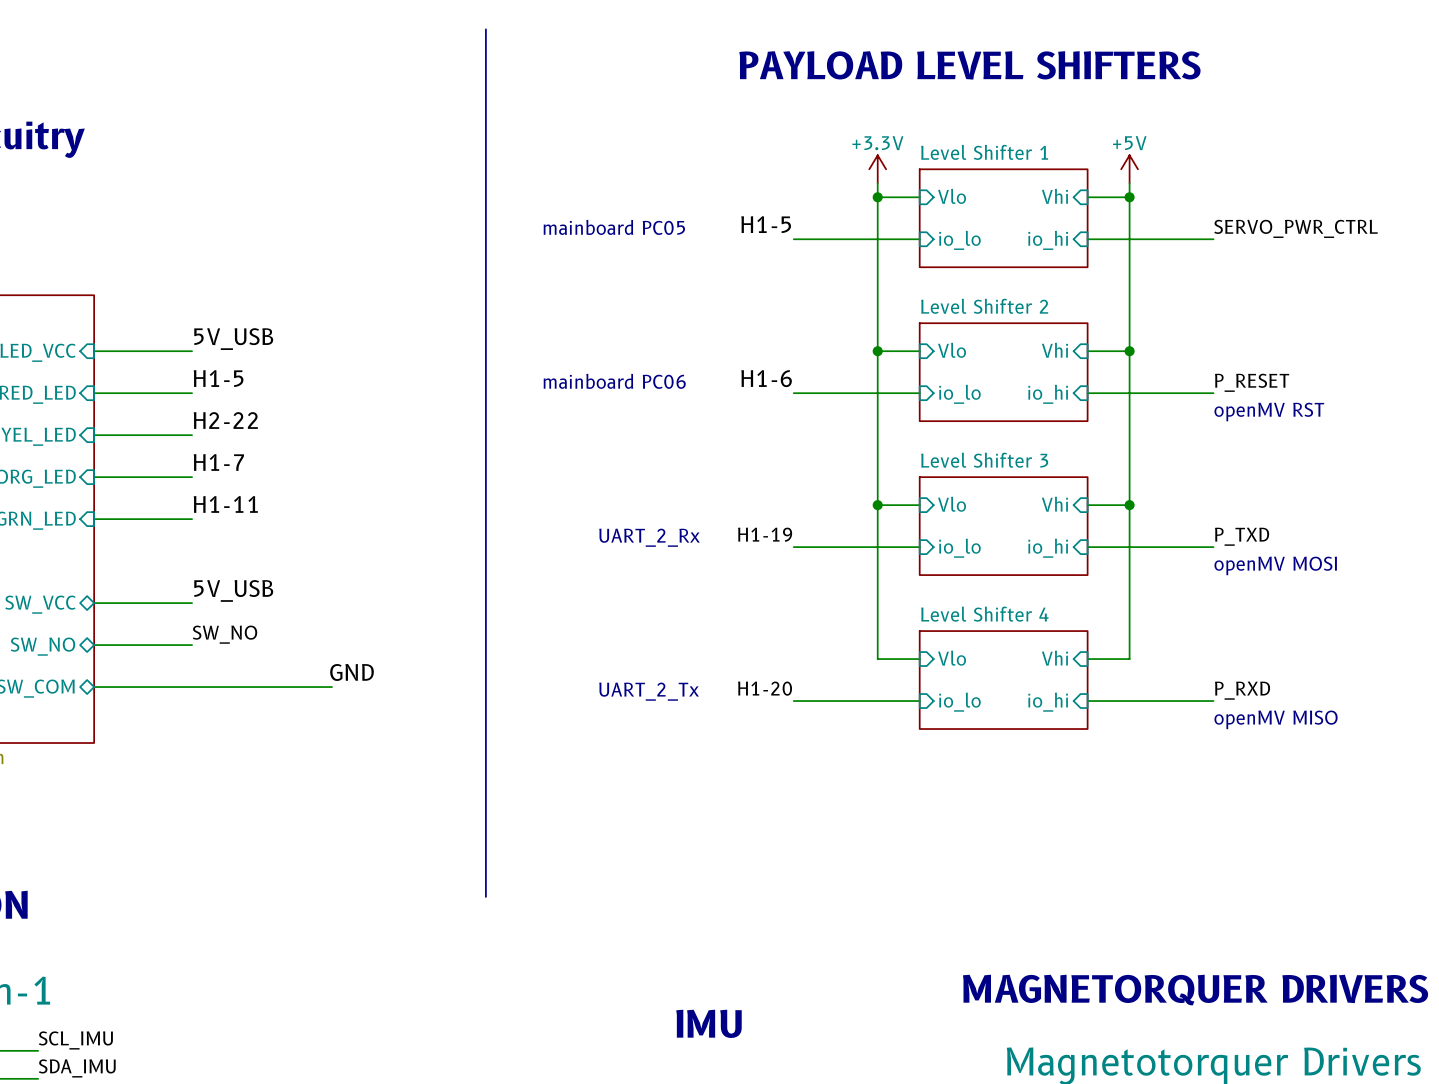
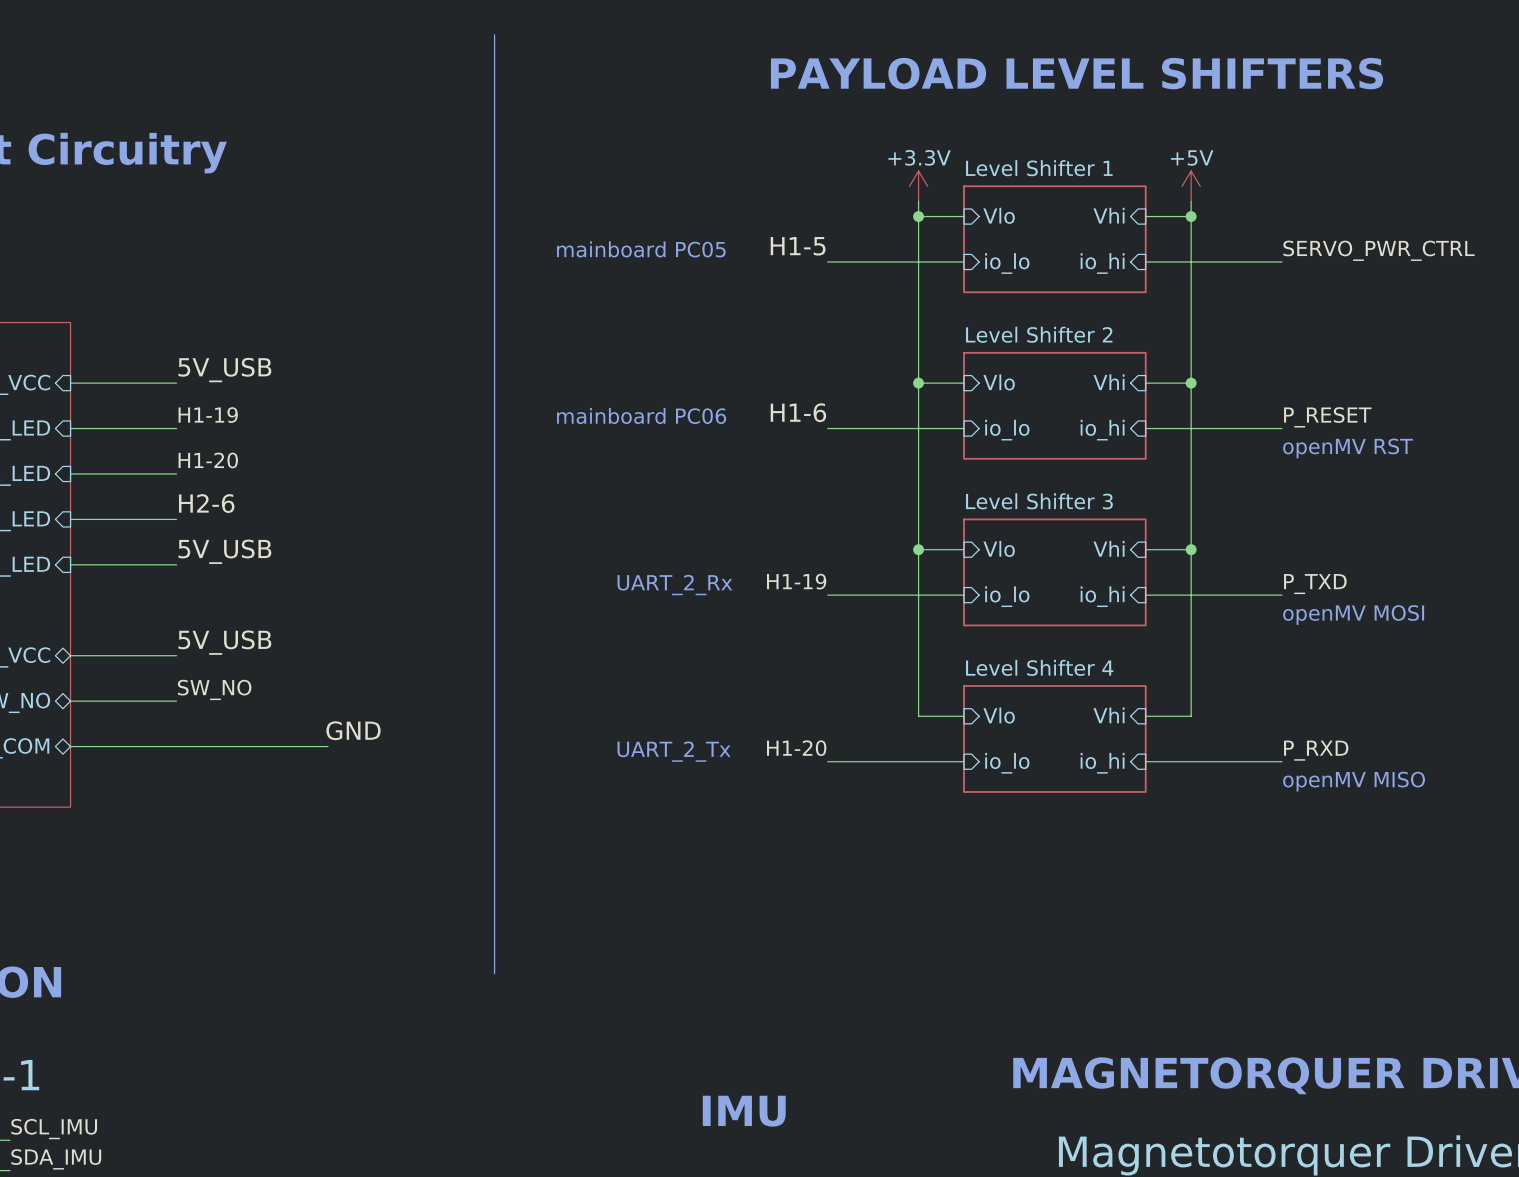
label: H1-5 (218, 378) -> H1-19 (208, 415)
label: H2-22 (225, 420) -> H1-20 (208, 460)
label: H1-7 (218, 462) -> H2-6 (206, 503)
label: H1-11 (225, 504) -> 5V_USB (224, 551)

